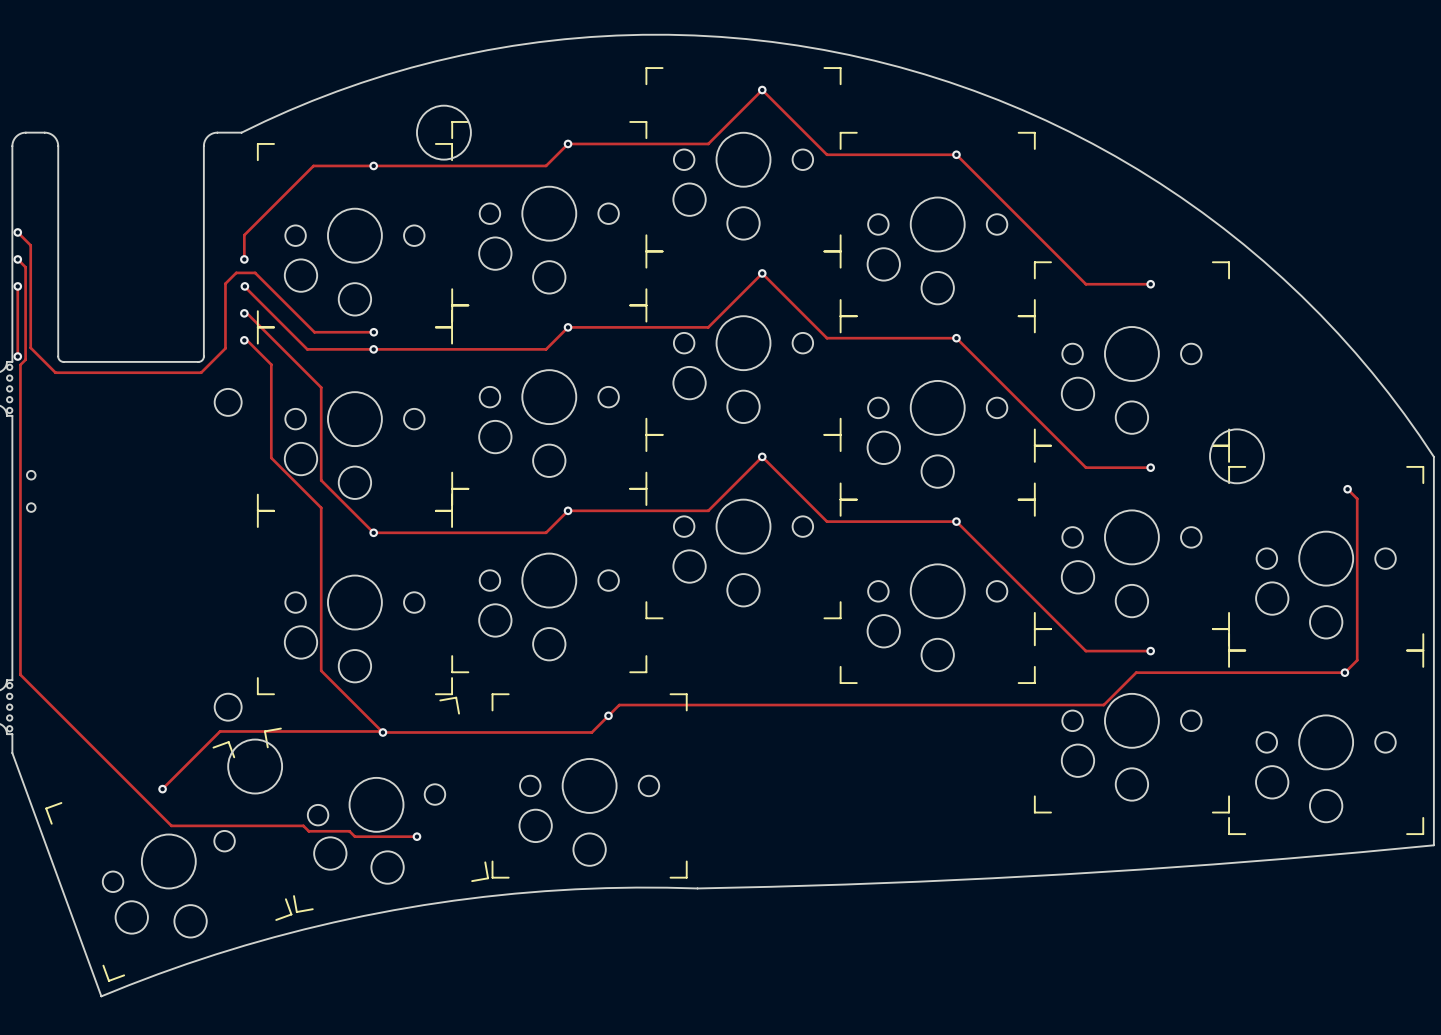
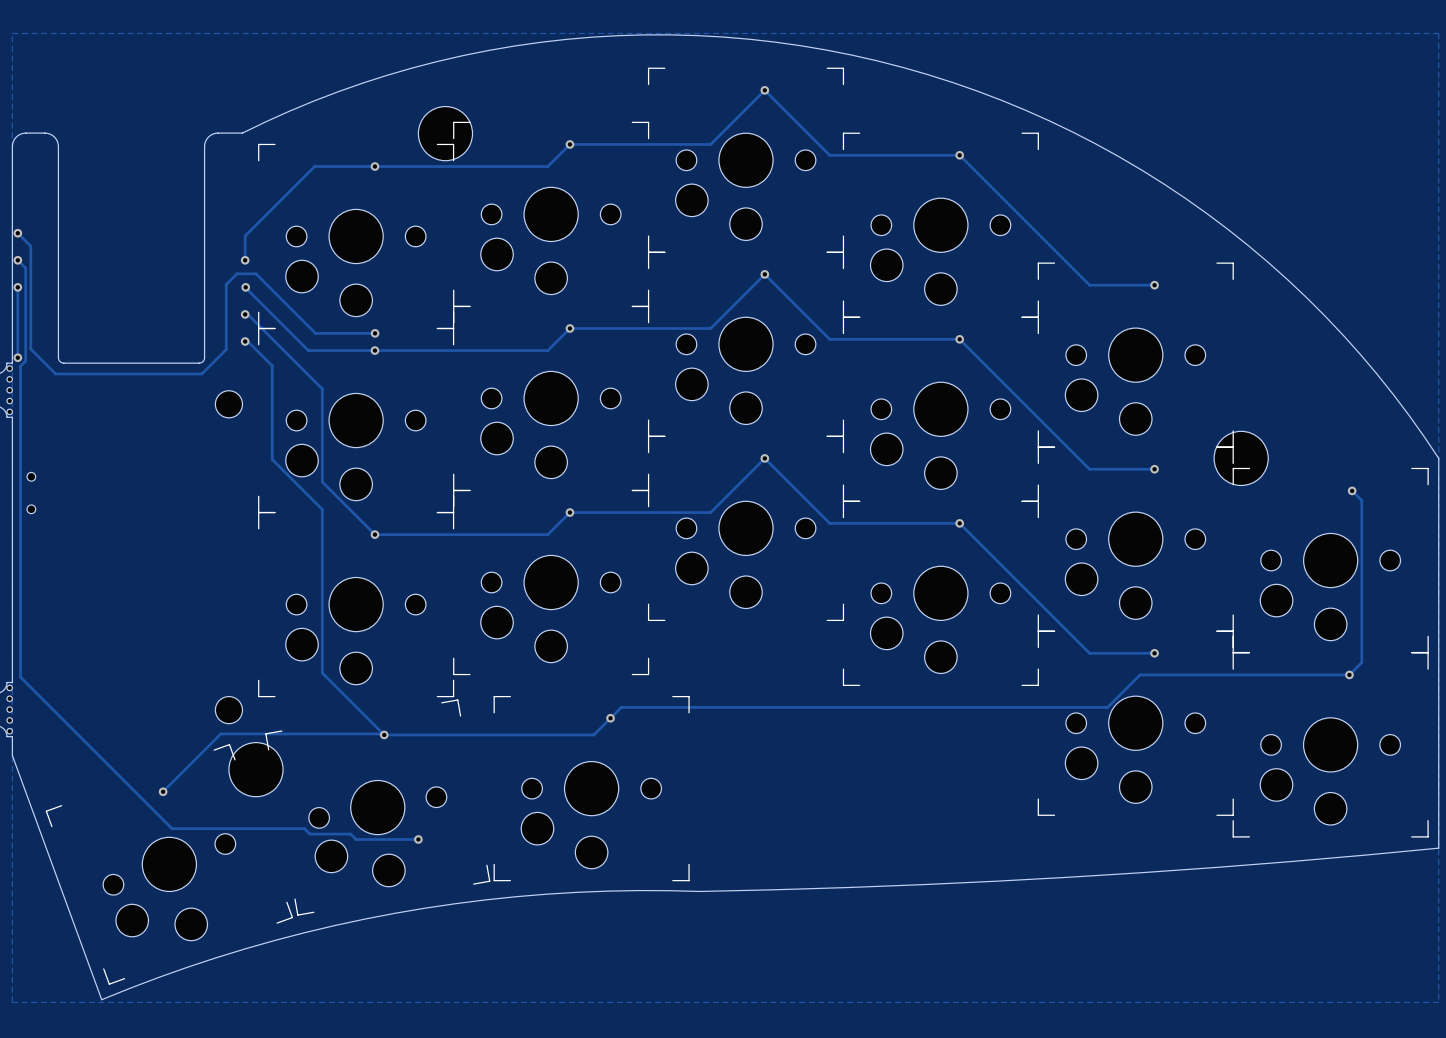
zone outline: none -> (12, 33) (1438, 33) (1438, 1002) (12, 1002) (12, 33)
round board edge: [416, 105, 472, 161] -> none
part: none -> (445, 133)
round board edge: [214, 388, 243, 417] -> none
part: none -> (228, 404)
round board edge: [1209, 428, 1265, 484] -> none
part: none -> (1241, 458)
round board edge: [214, 693, 243, 722] -> none
part: none -> (228, 710)
round board edge: [227, 739, 283, 795] -> none
part: none -> (255, 769)

